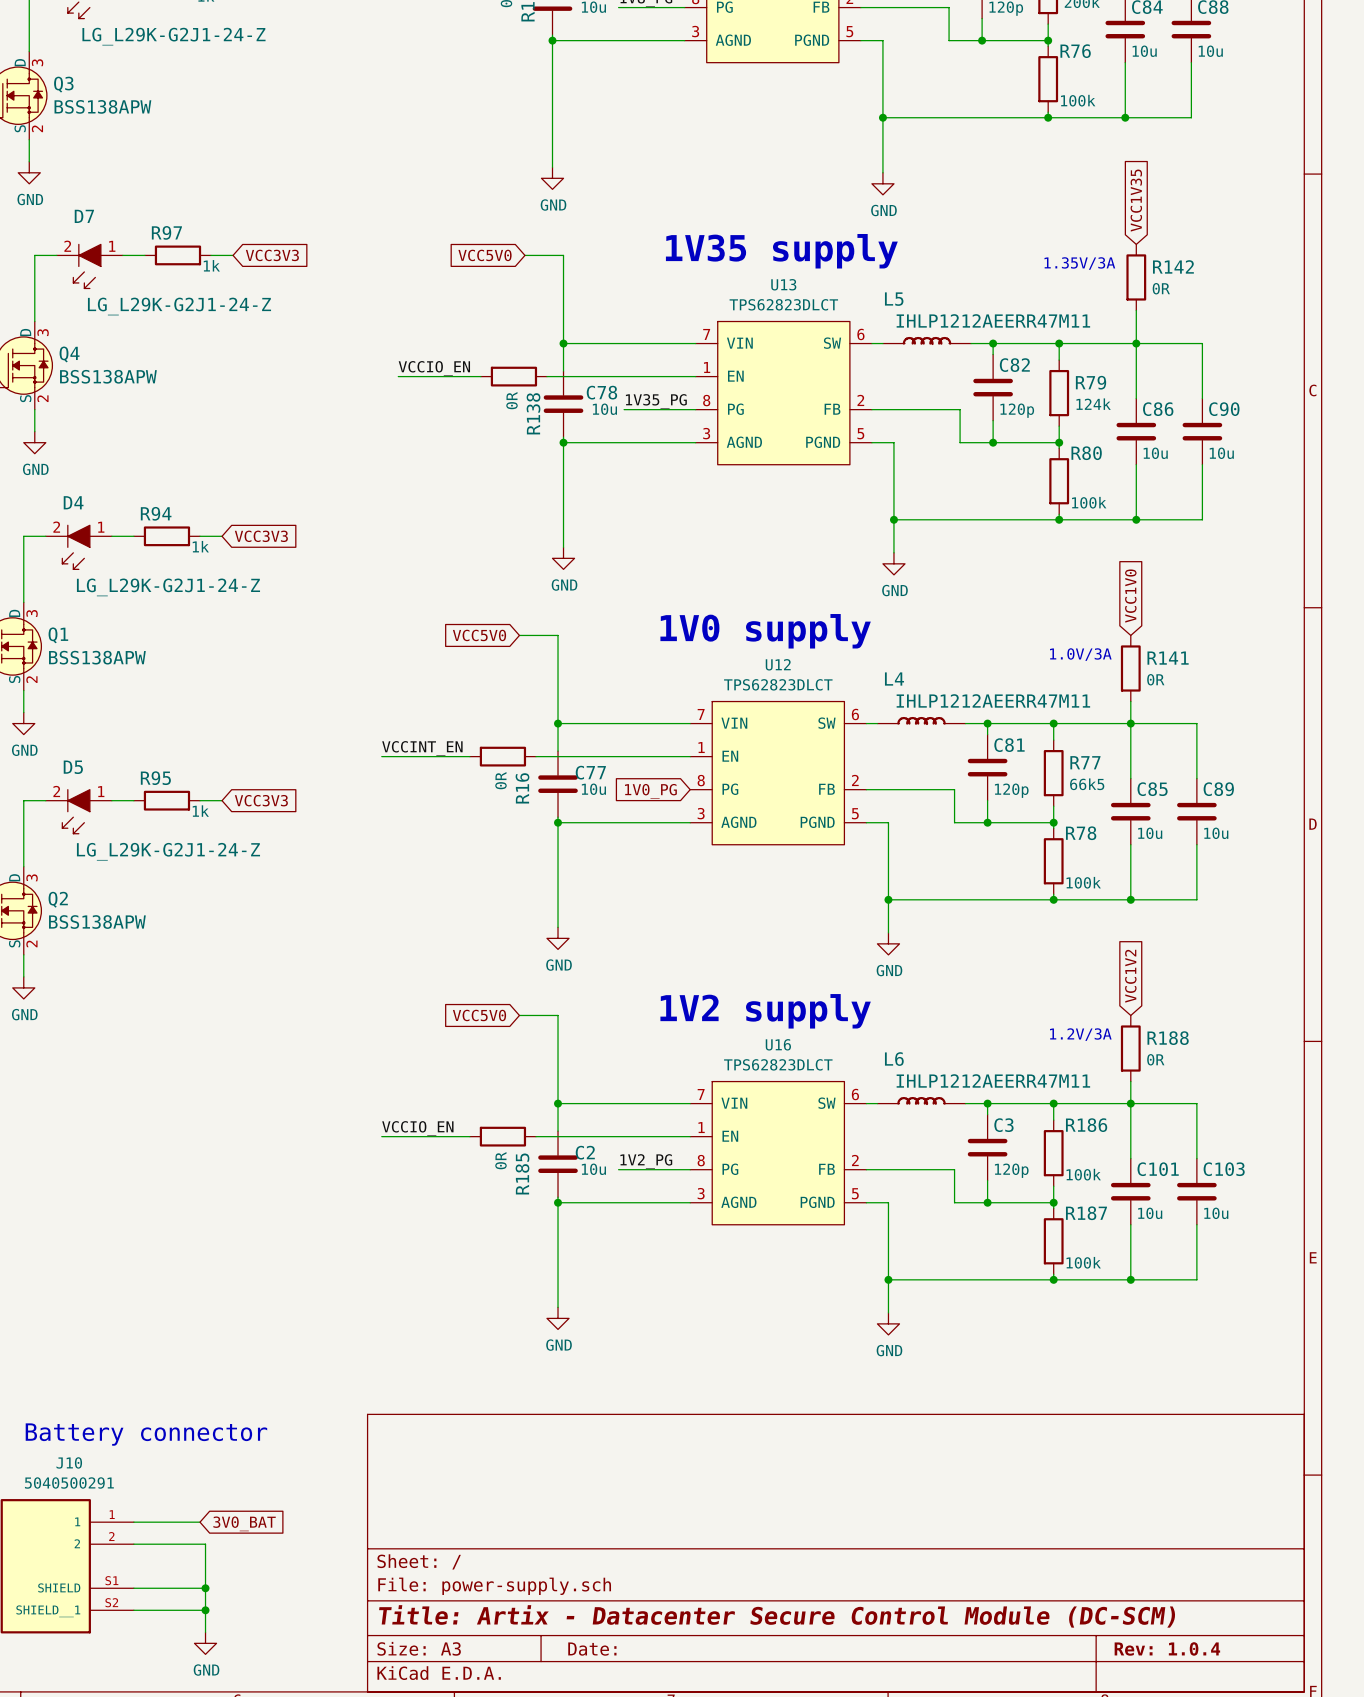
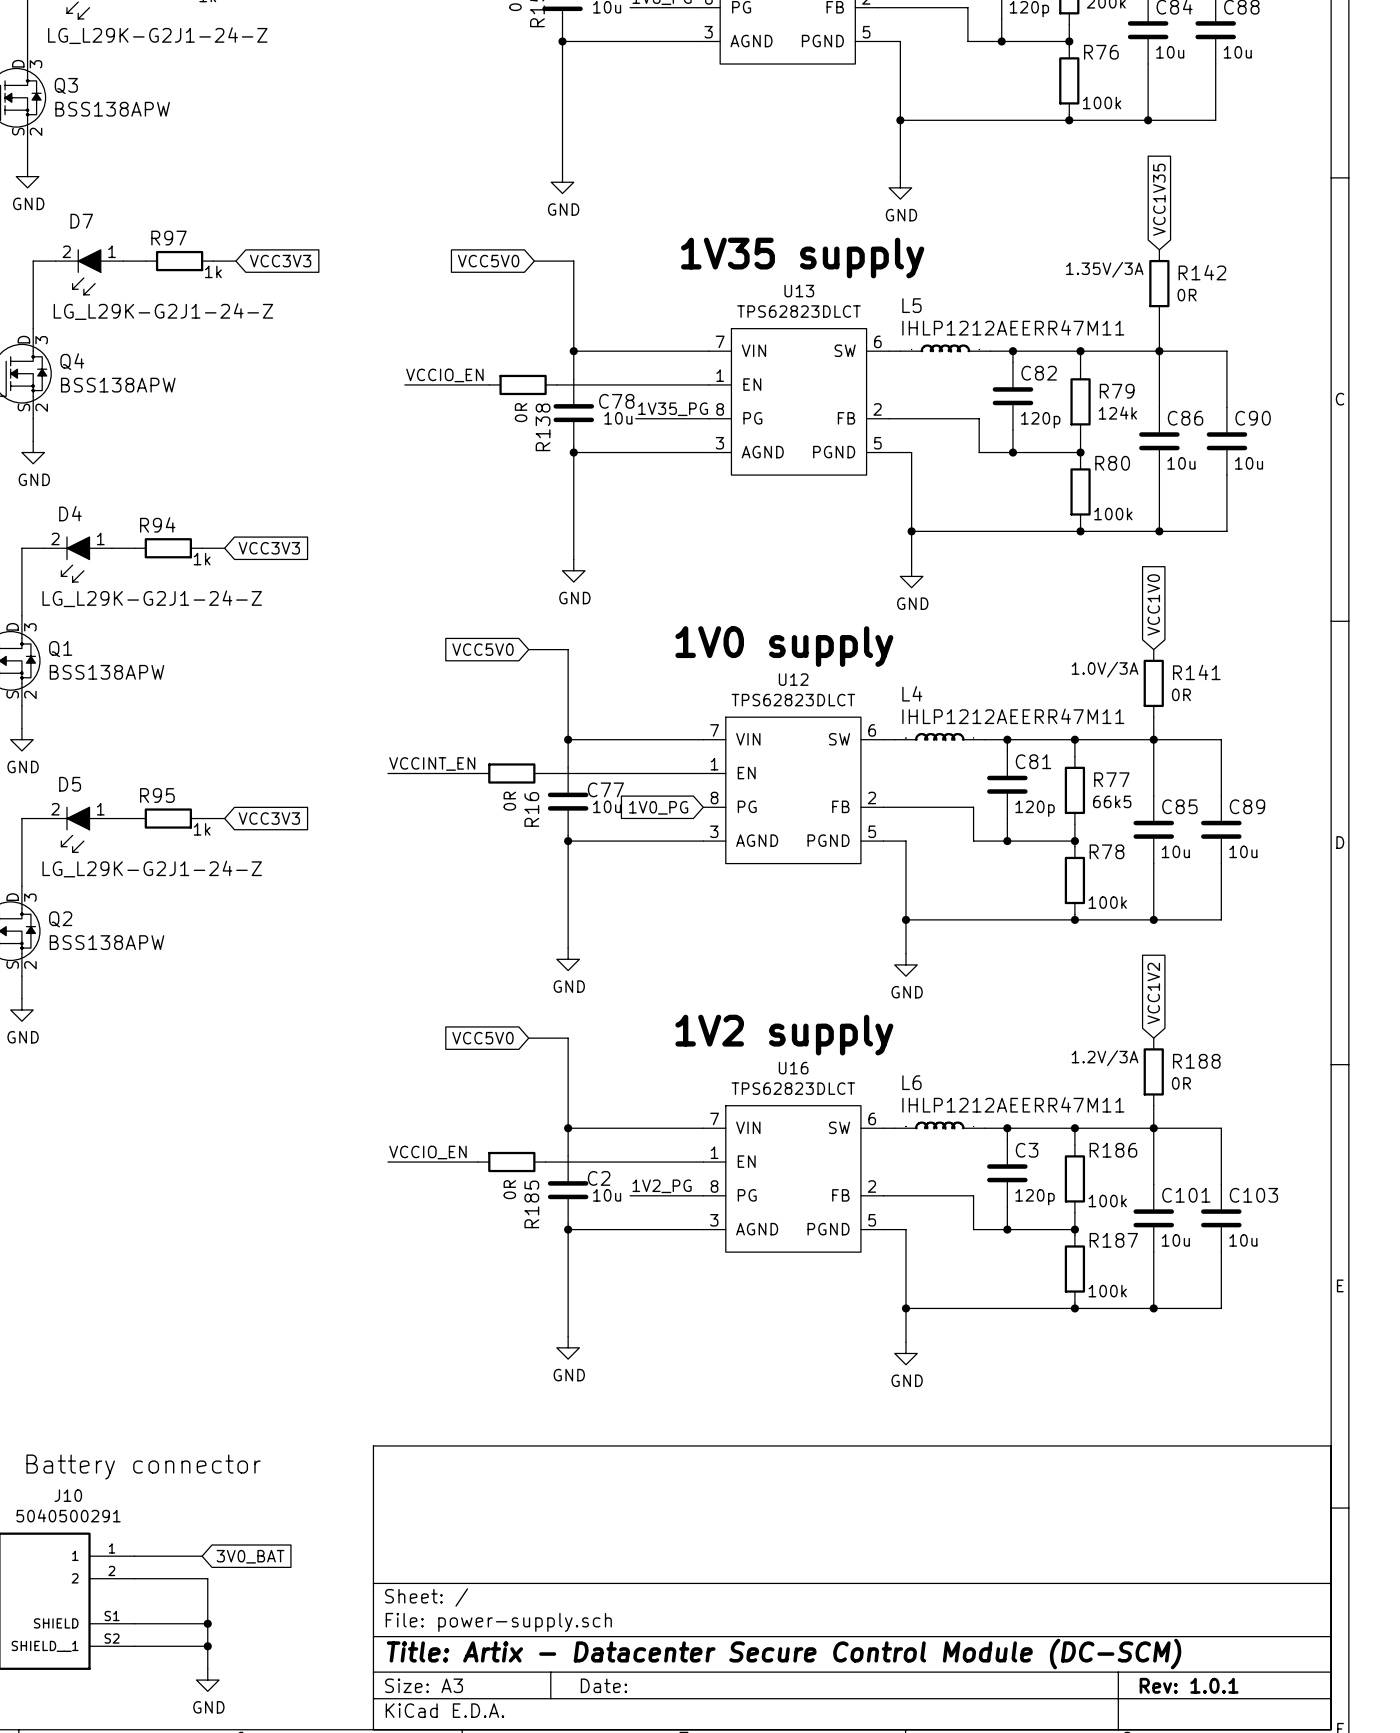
title block: Rev: 1.0.4 (1167, 1648) -> Rev: 1.0.1 (1189, 1685)

